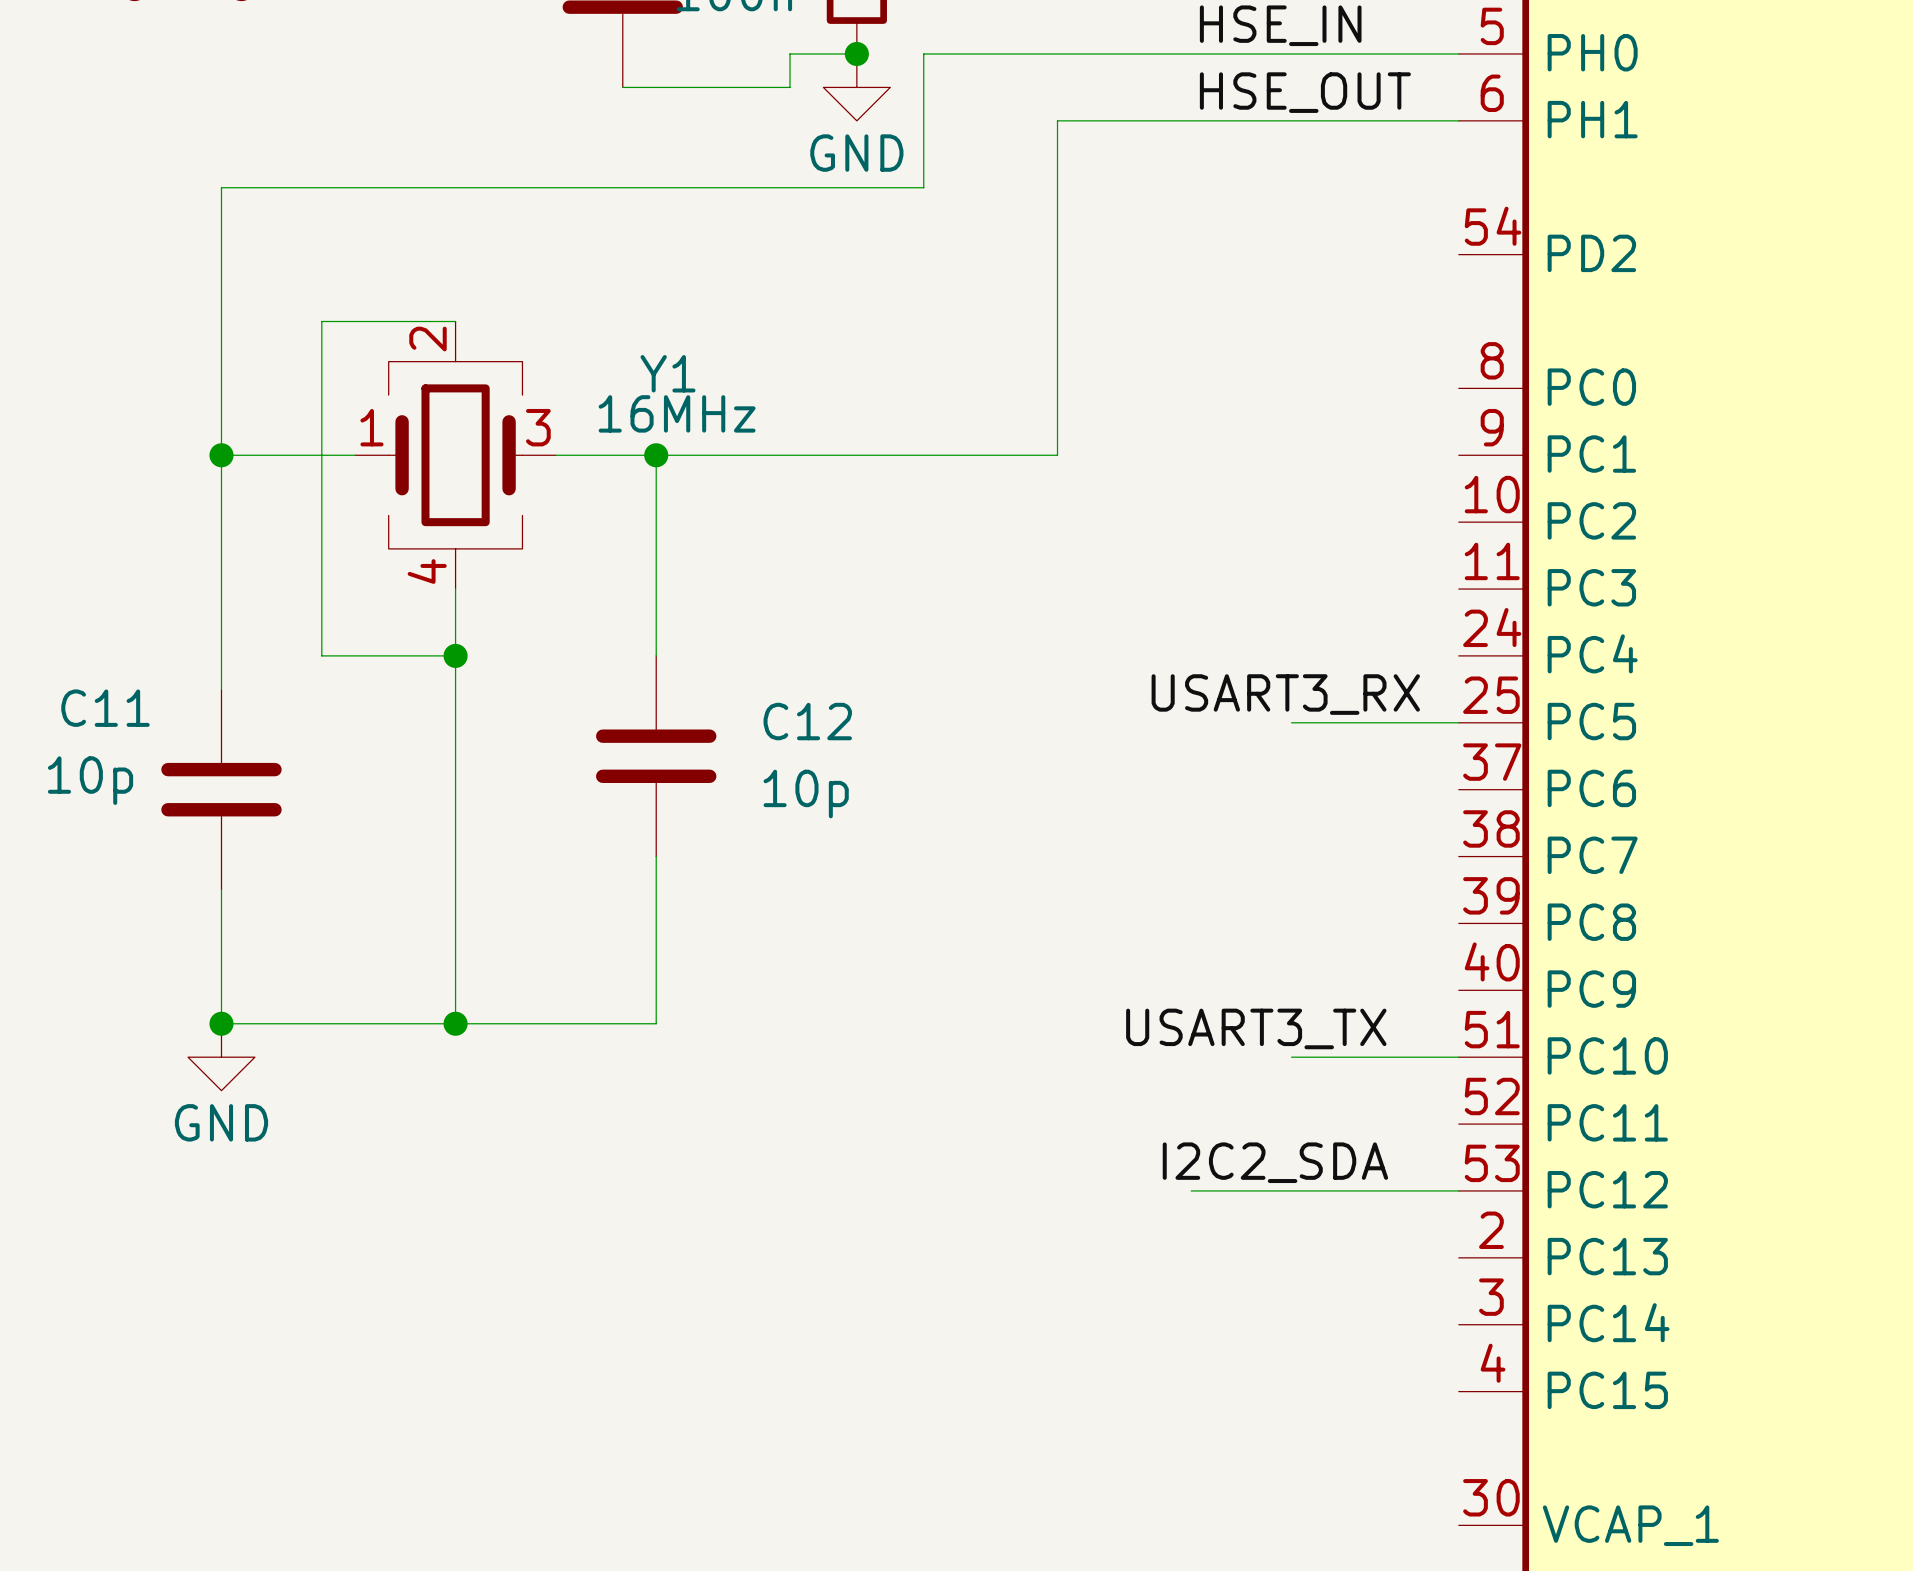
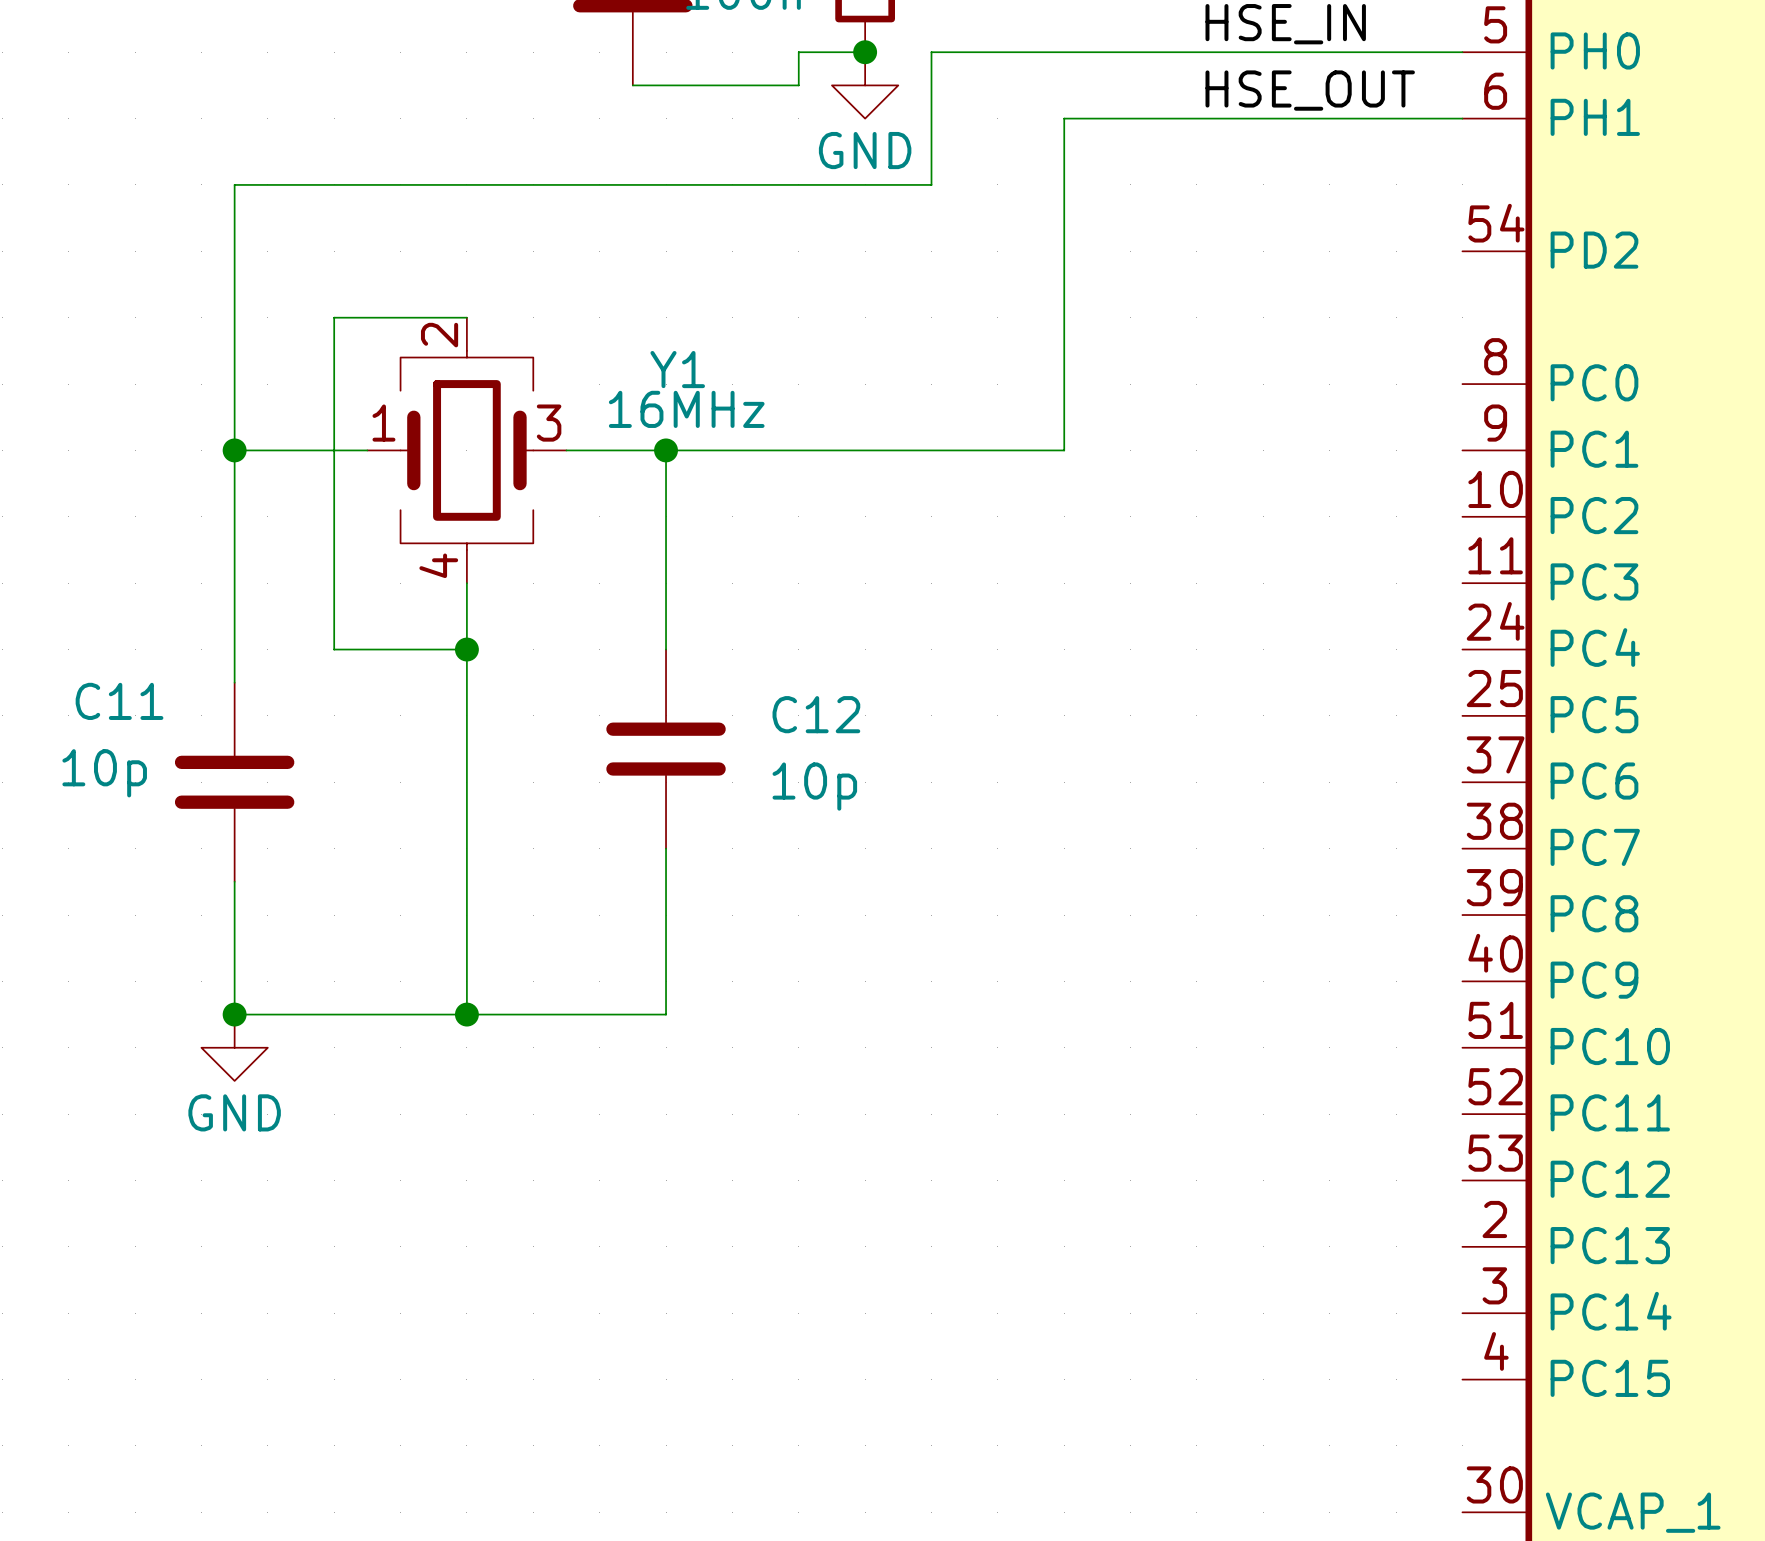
label: USART3_RX (1285, 694) -> none
wire: (1291, 722) (1458, 722) -> none
label: USART3_TX (1256, 1028) -> none
wire: (1291, 1057) (1458, 1057) -> none
label: I2C2_SDA (1275, 1162) -> none
wire: (1191, 1190) (1458, 1190) -> none

